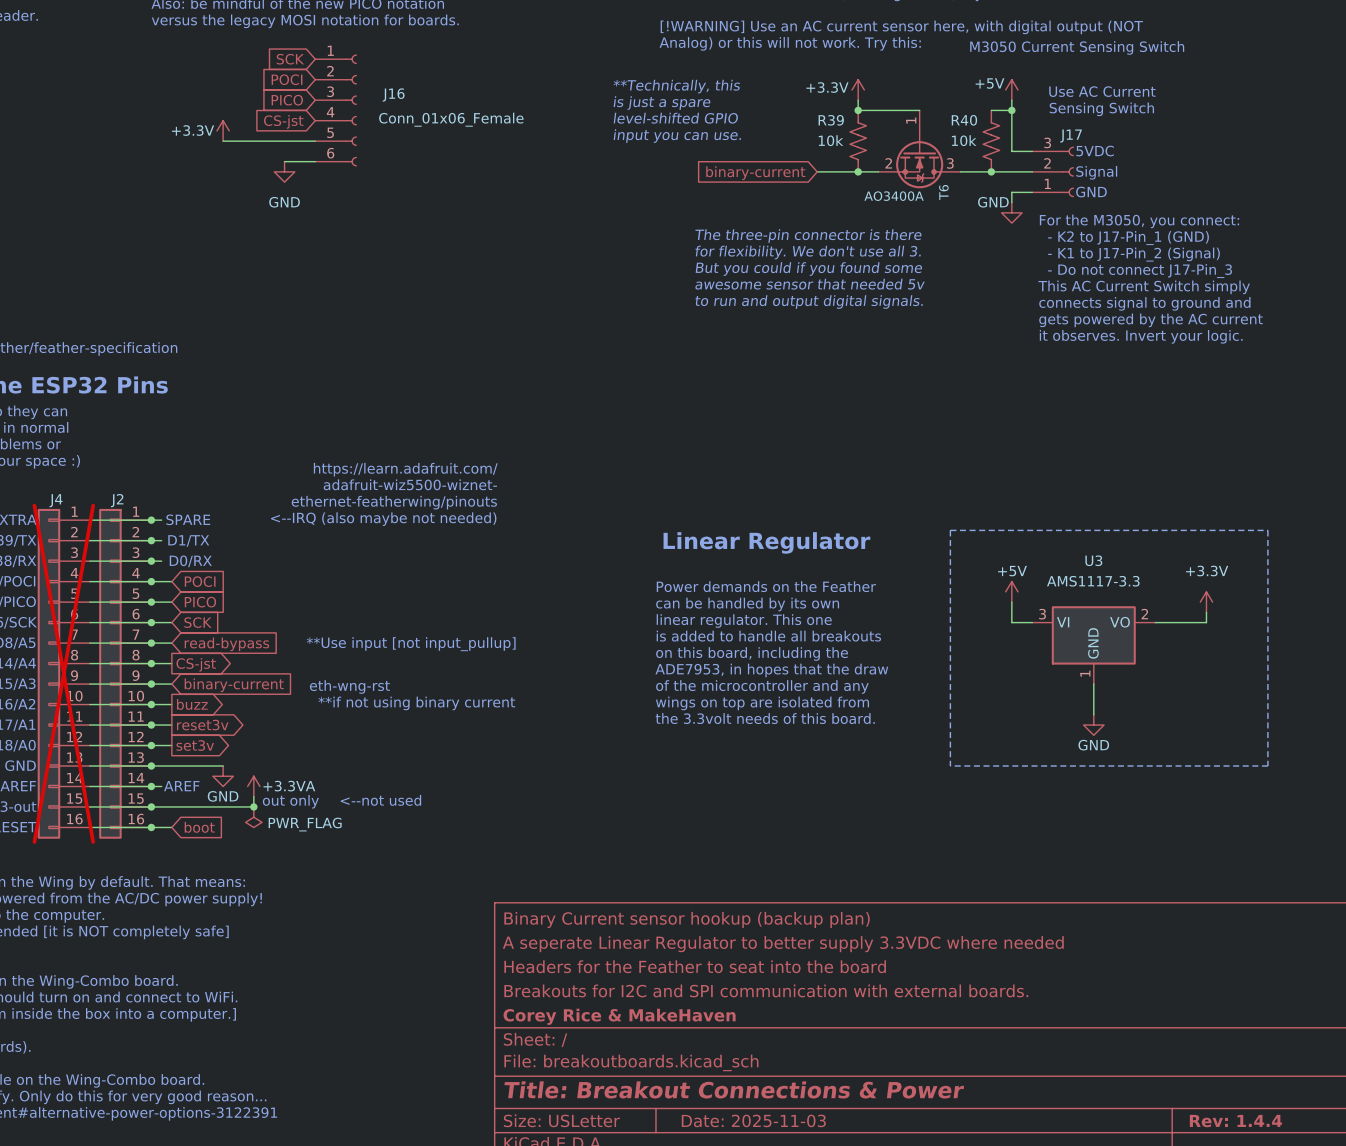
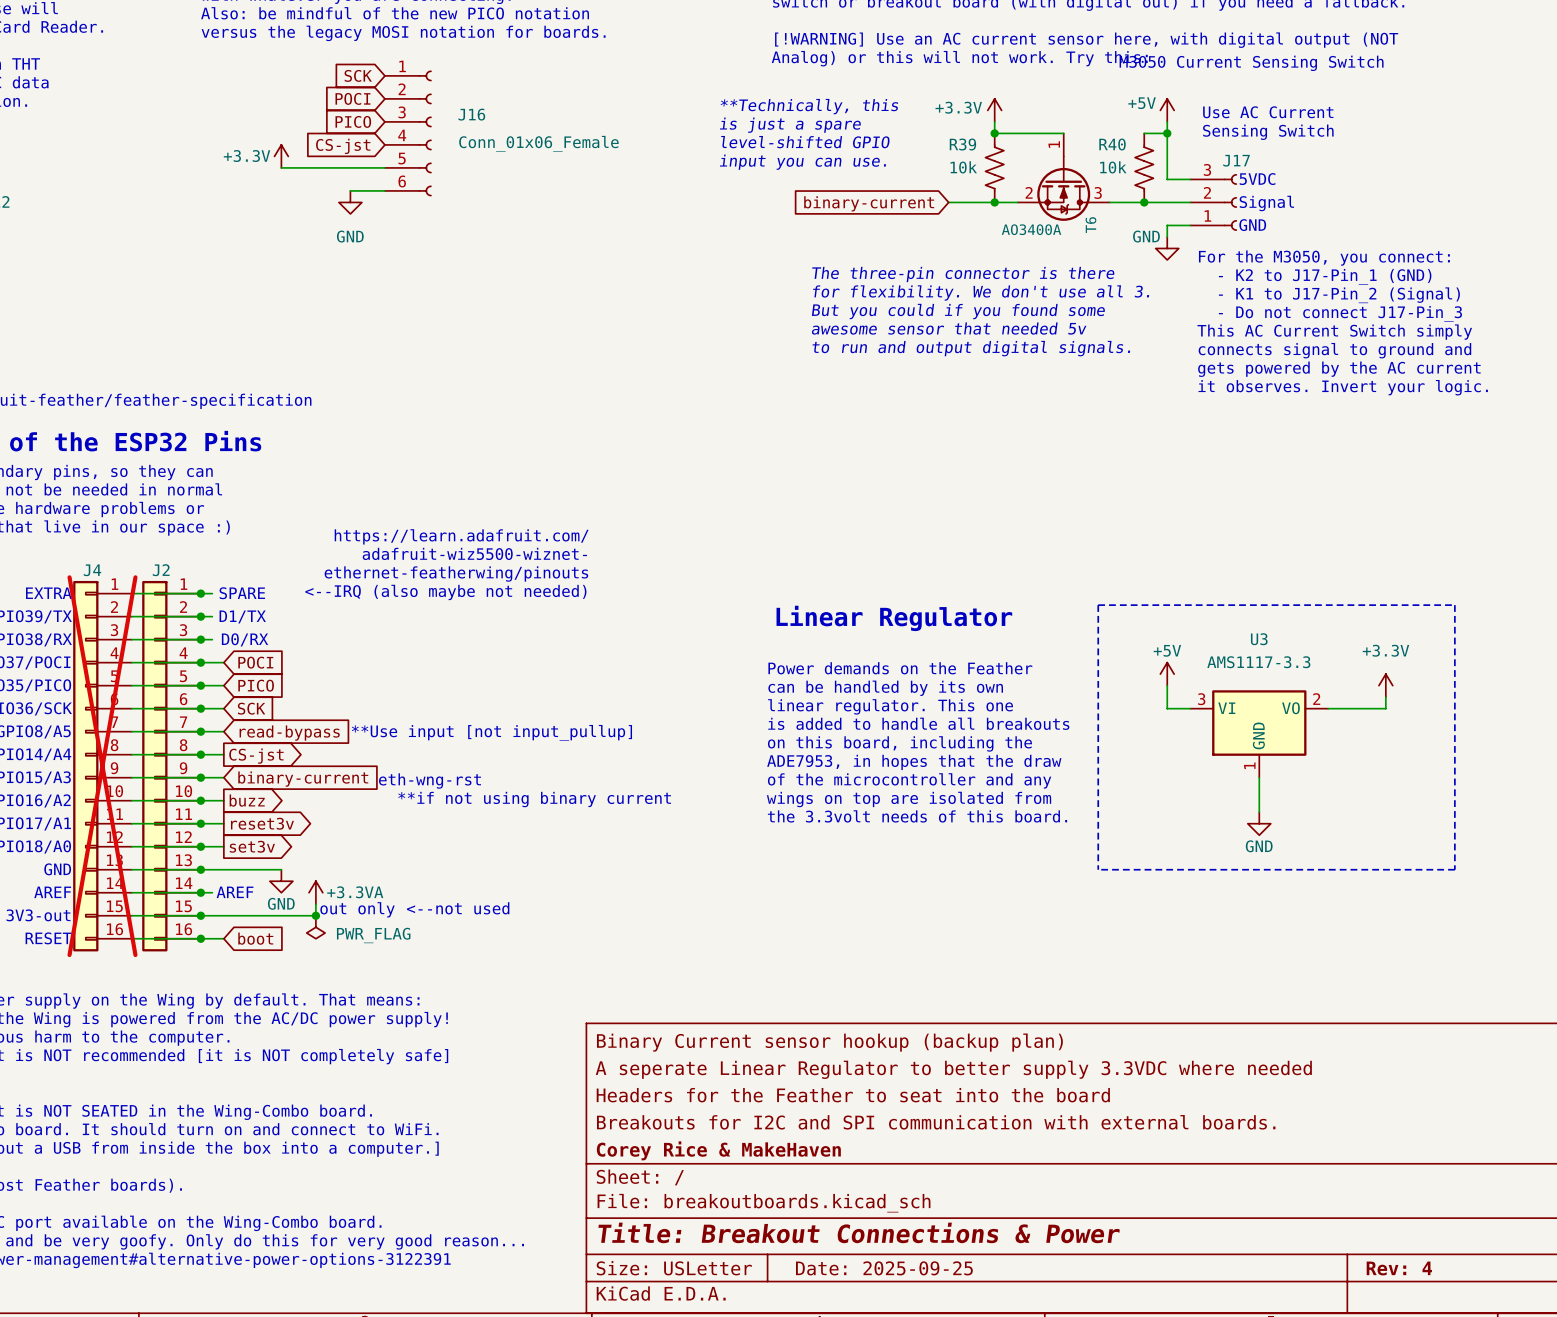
title block: Date: 2025-11-03 (753, 1120) -> Date: 2025-09-25 (884, 1268)
title block: Rev: 1.4.4 (1235, 1121) -> Rev: 4 (1399, 1268)

